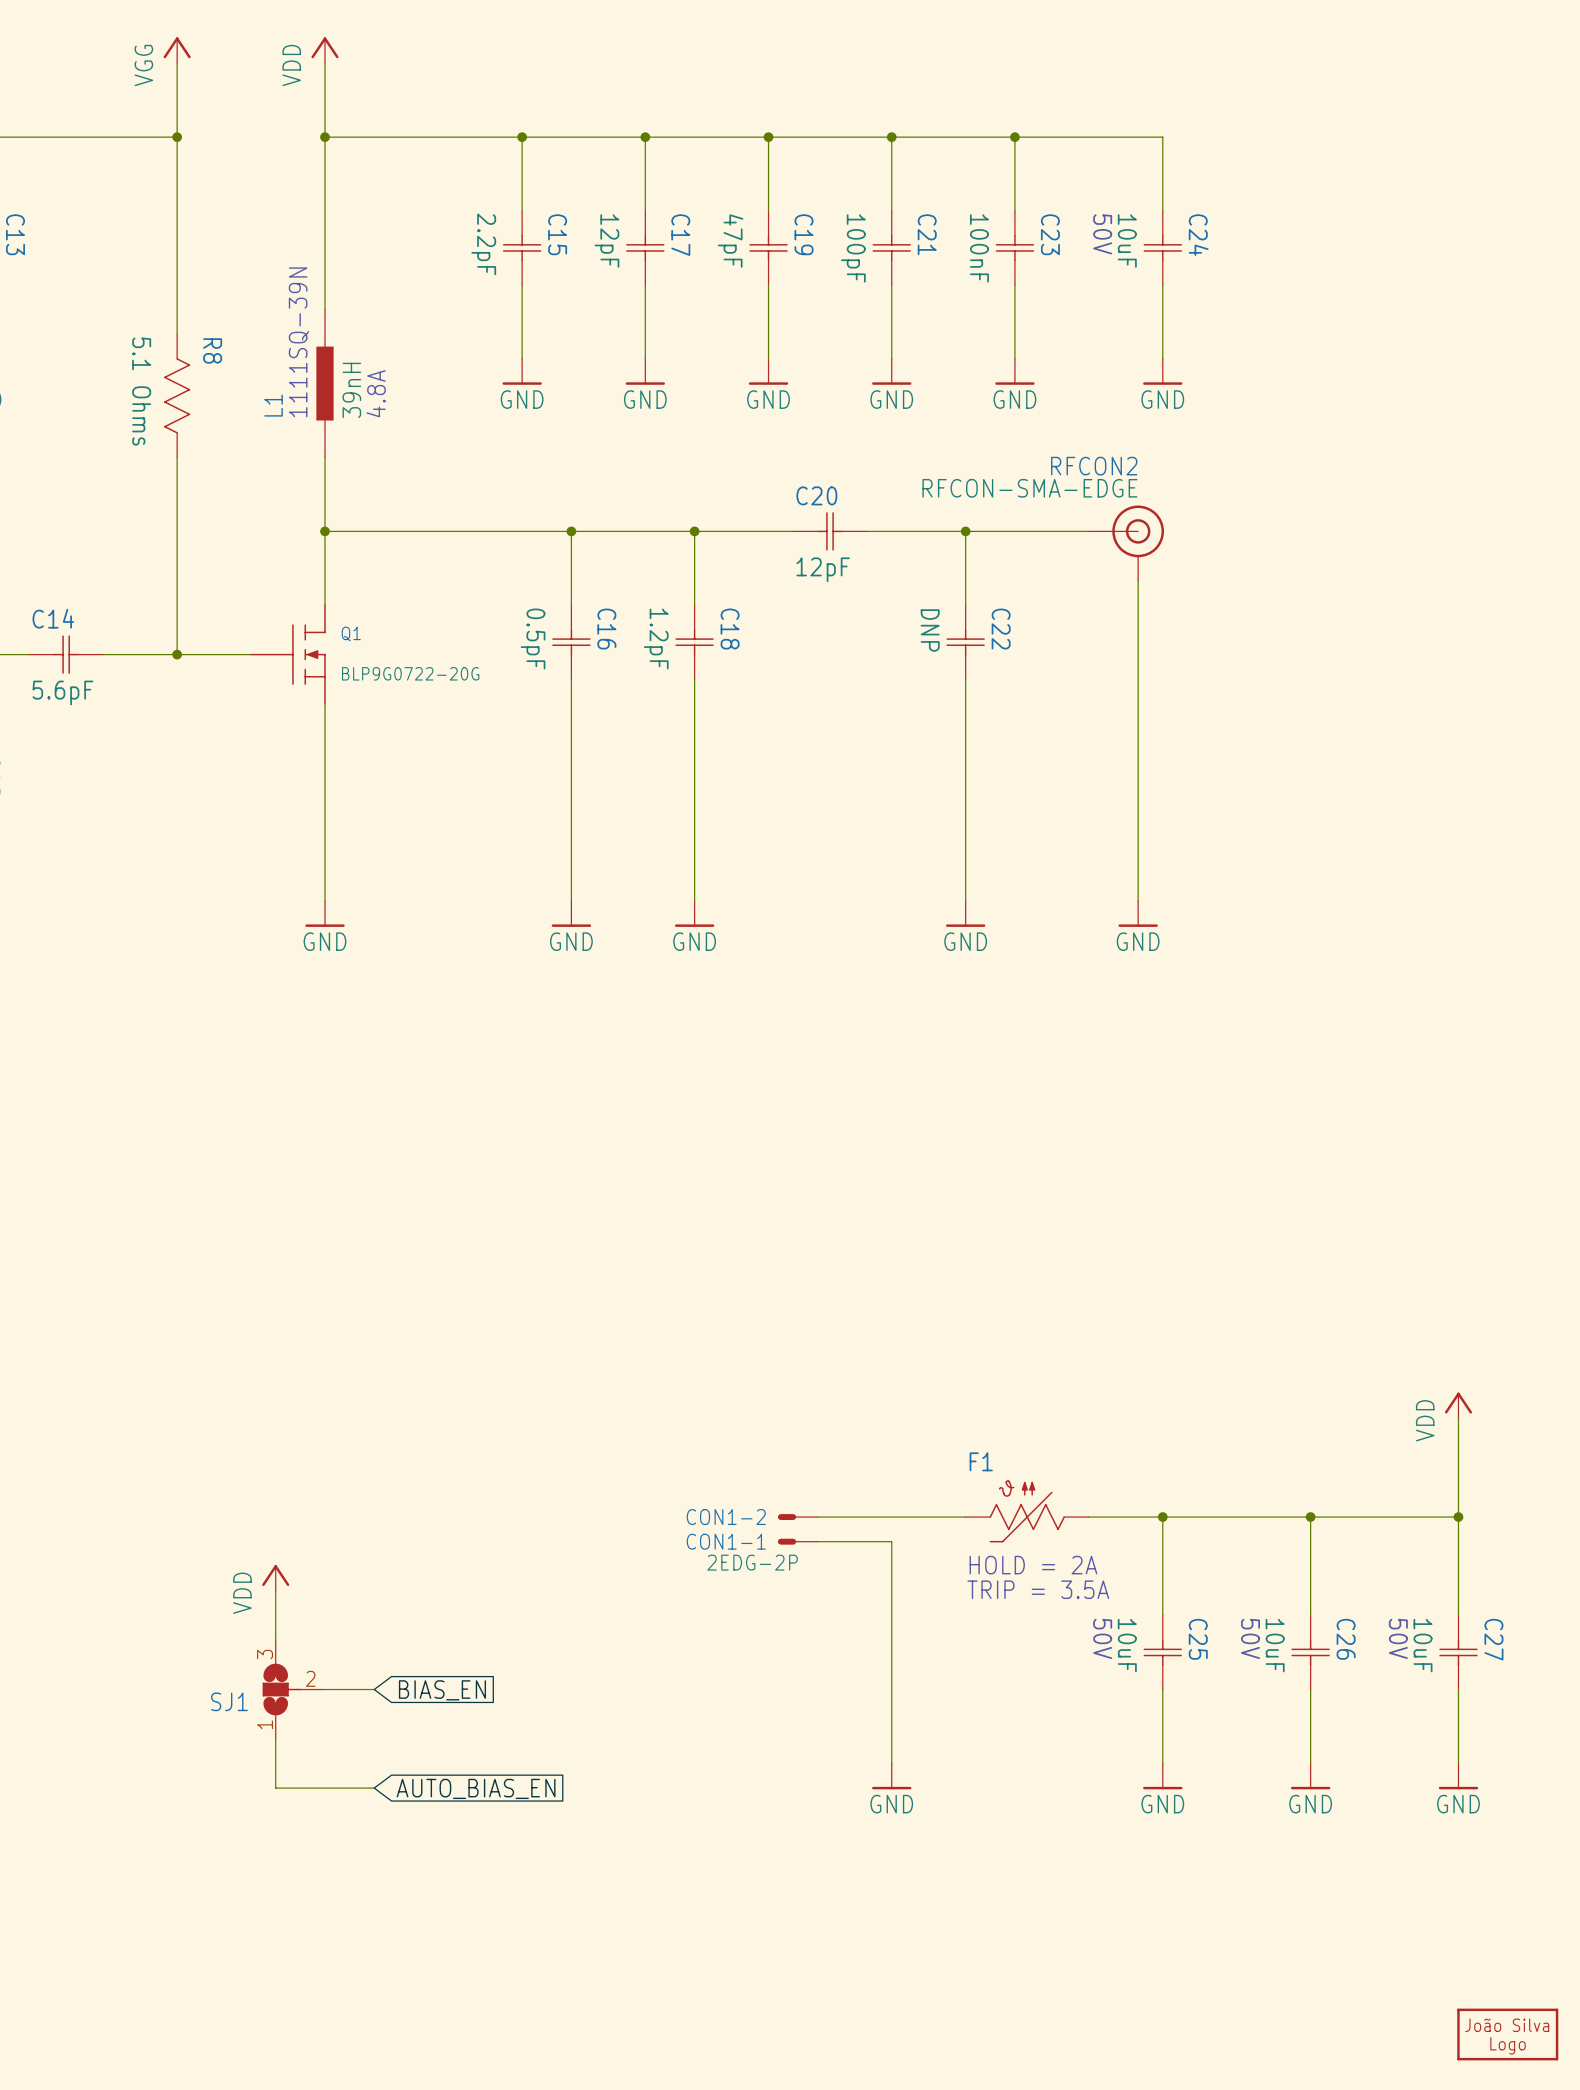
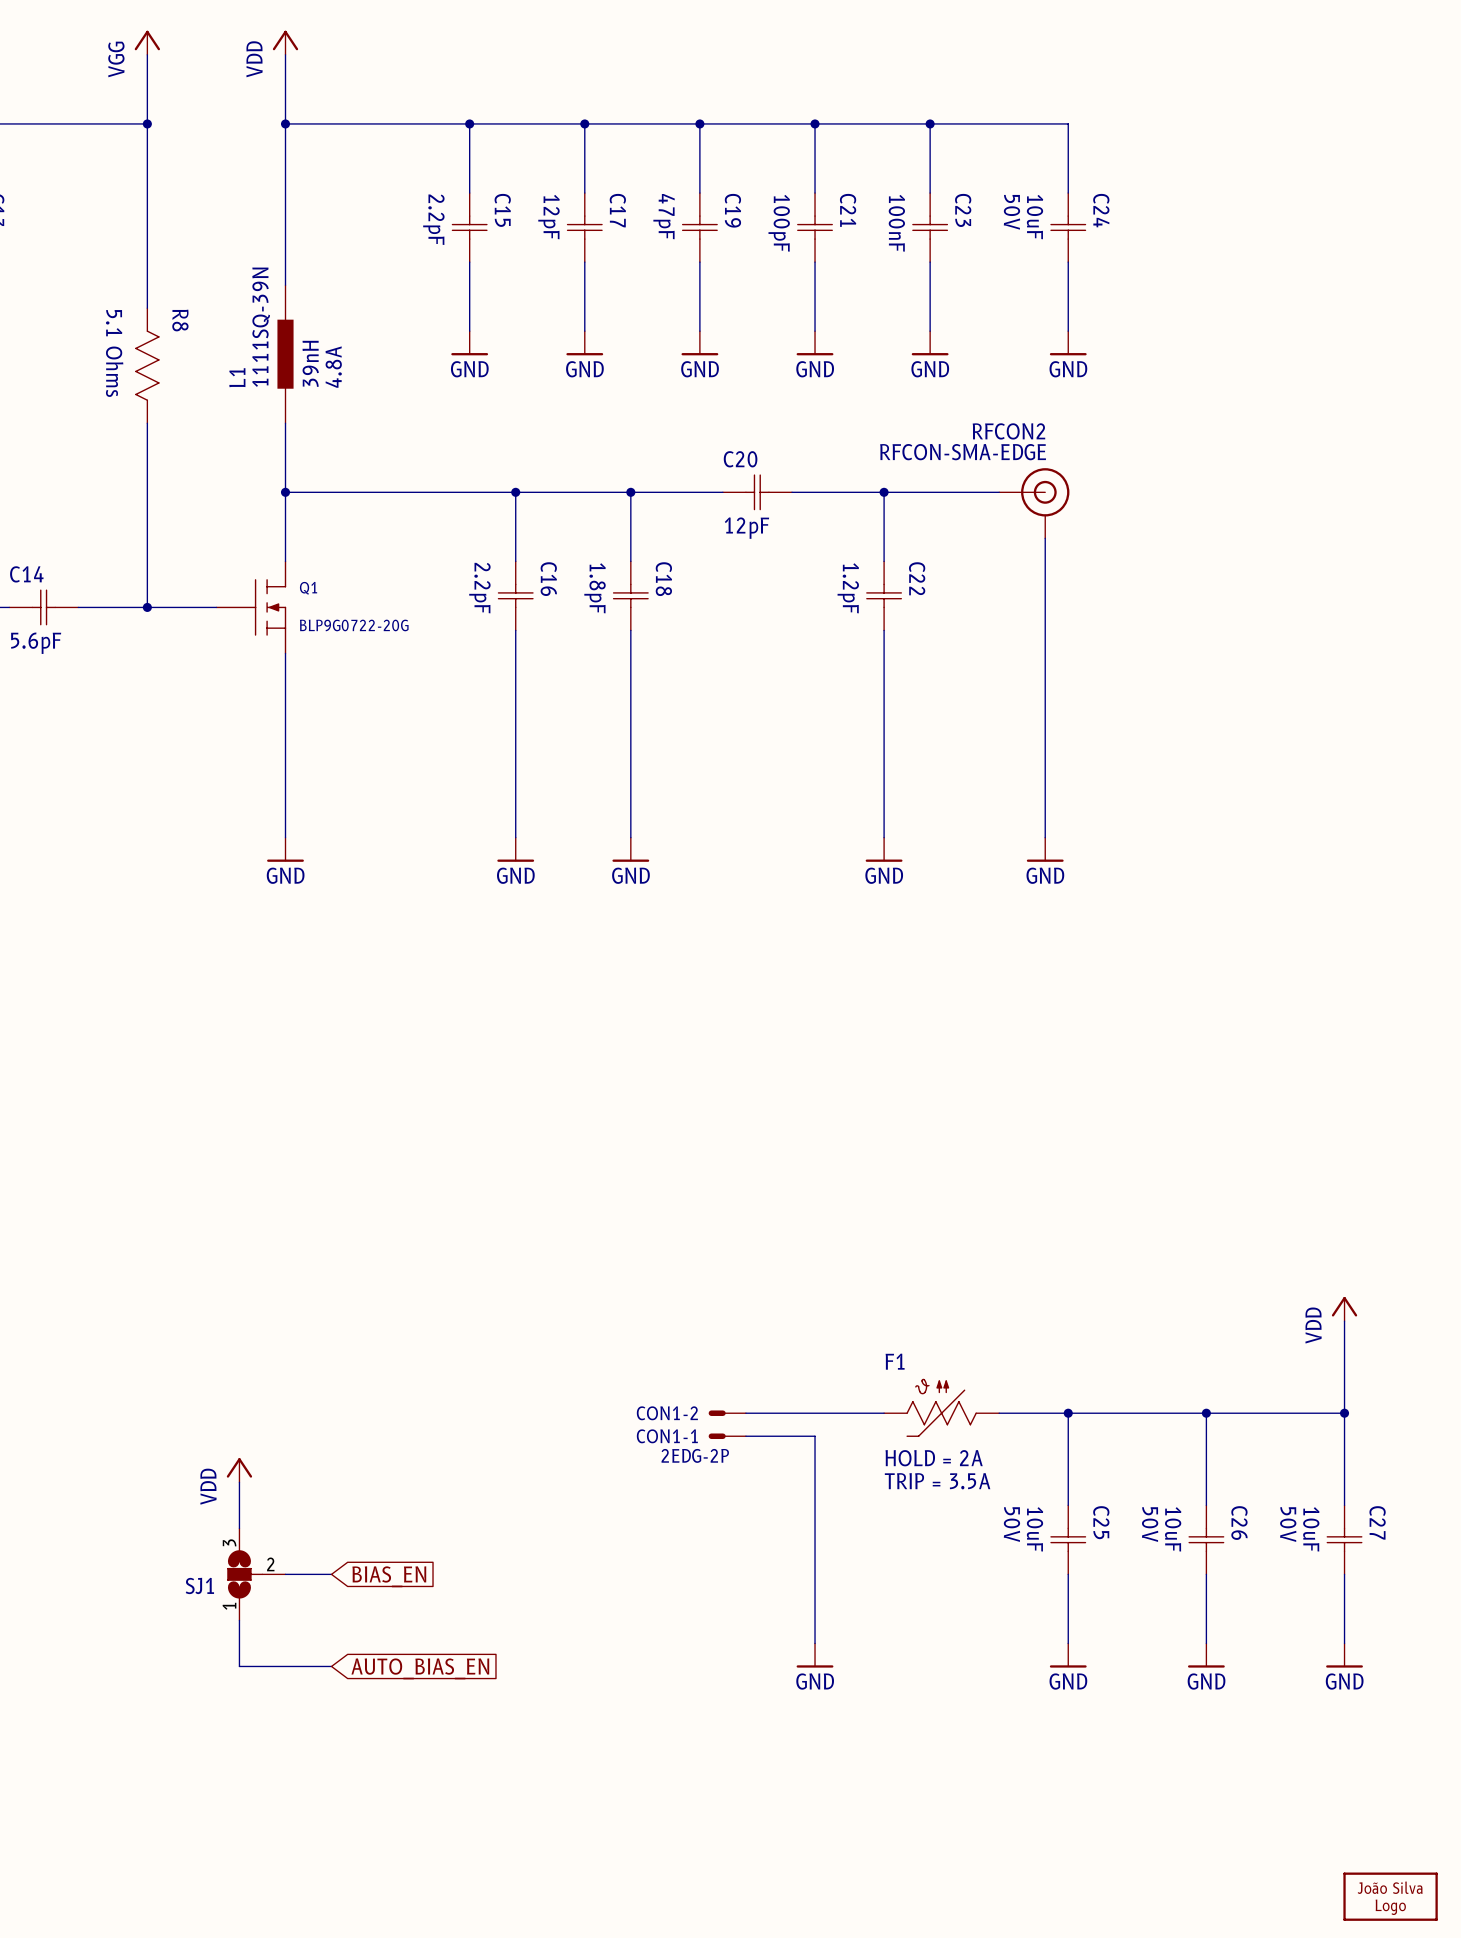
C22 value: DNP (930, 630) -> 1.2pF (848, 588)
C16 value: 0.5pF (533, 638) -> 2.2pF (479, 588)
C18 value: 1.2pF (656, 638) -> 1.8pF (595, 588)

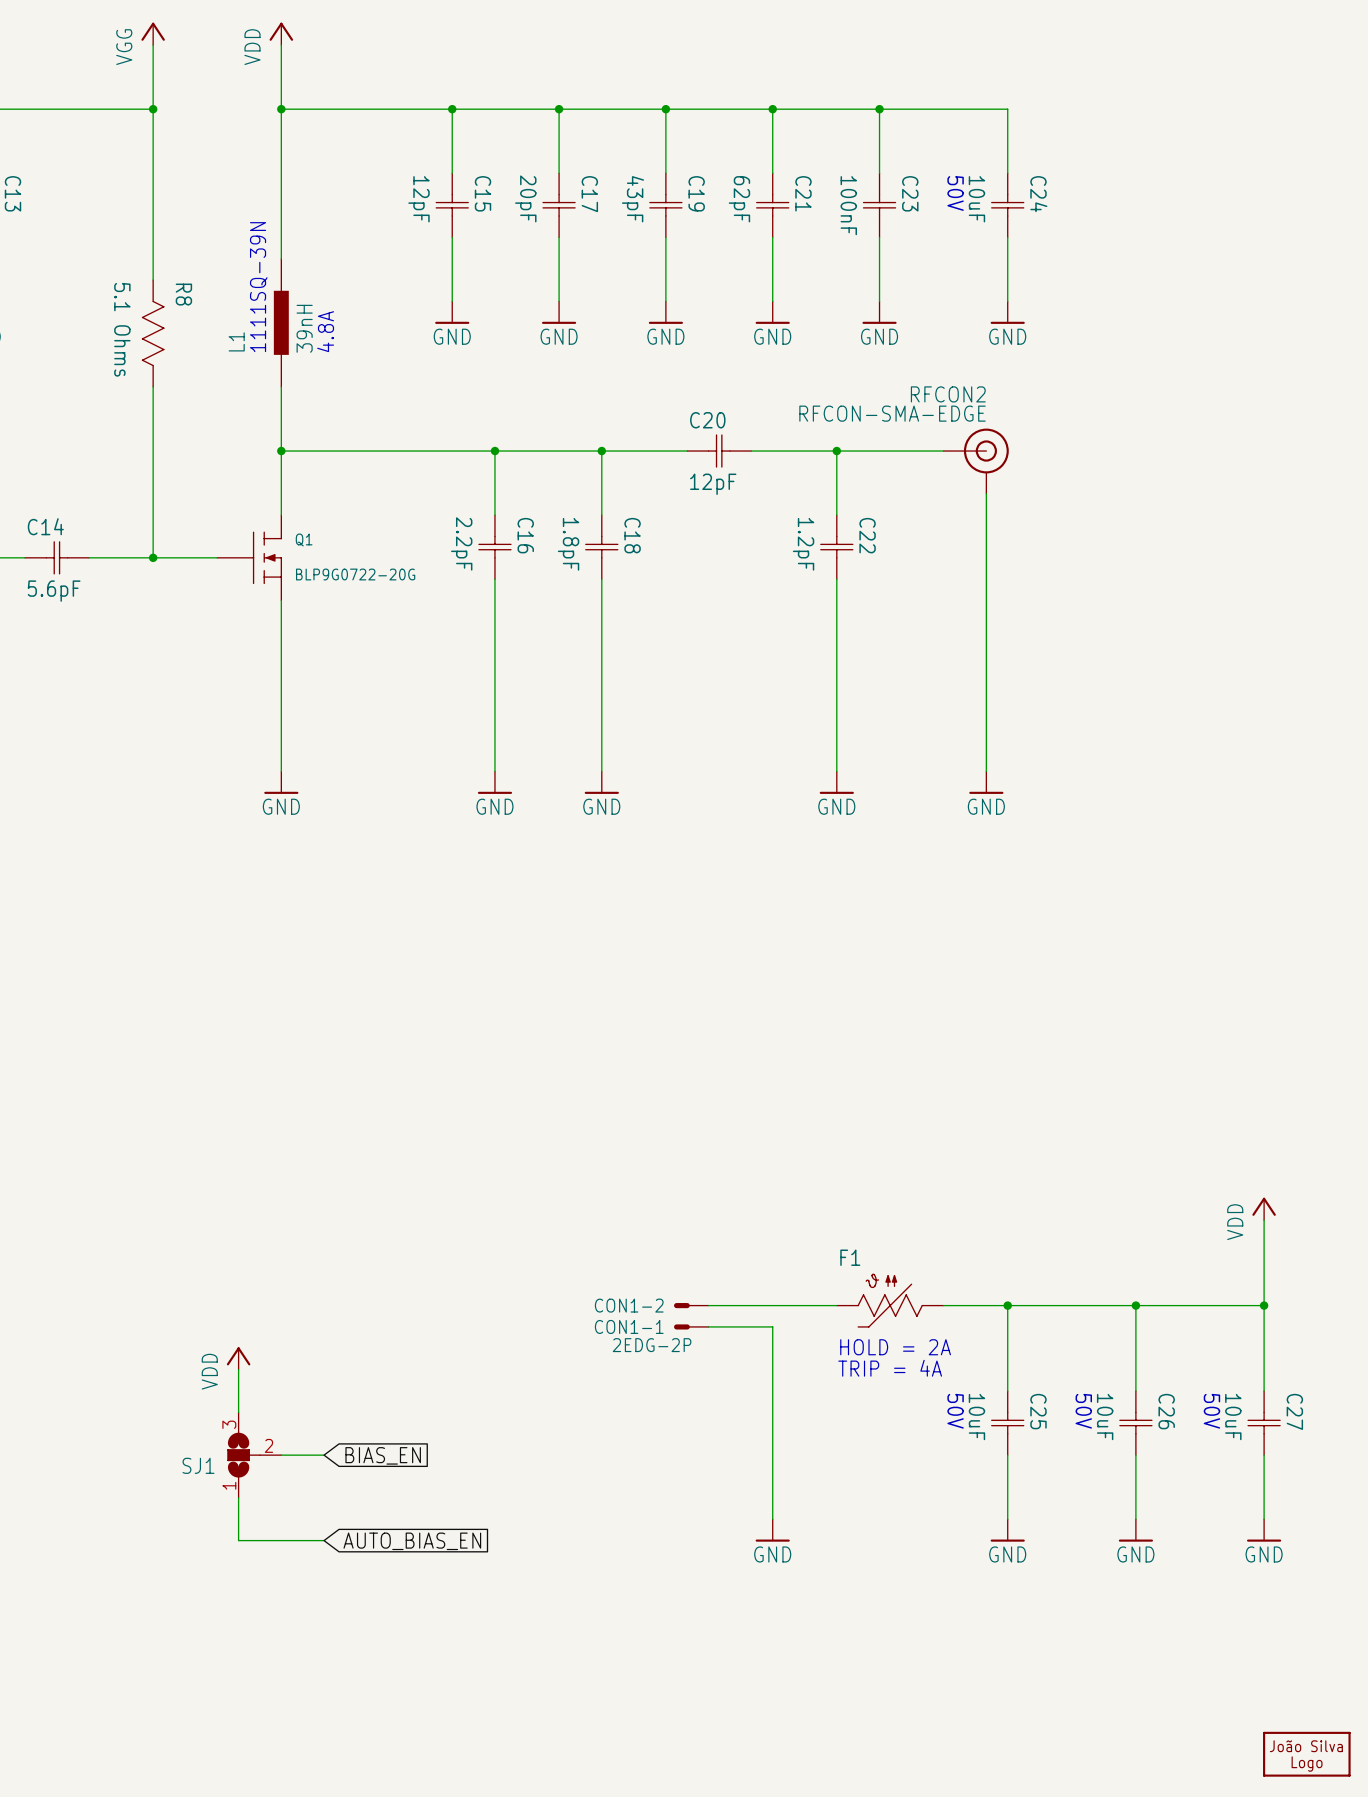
C19 value: 47pF (664, 216) -> 43pF (632, 199)
C17 value: 12pF (548, 217) -> 20pF (525, 198)
C15 value: 2.2pF (433, 219) -> 12pF (418, 199)
C21 value: 100pF (779, 223) -> 62pF (739, 199)
F1 text: TRIP = 3.5A (937, 1481) -> TRIP = 4A (890, 1368)

